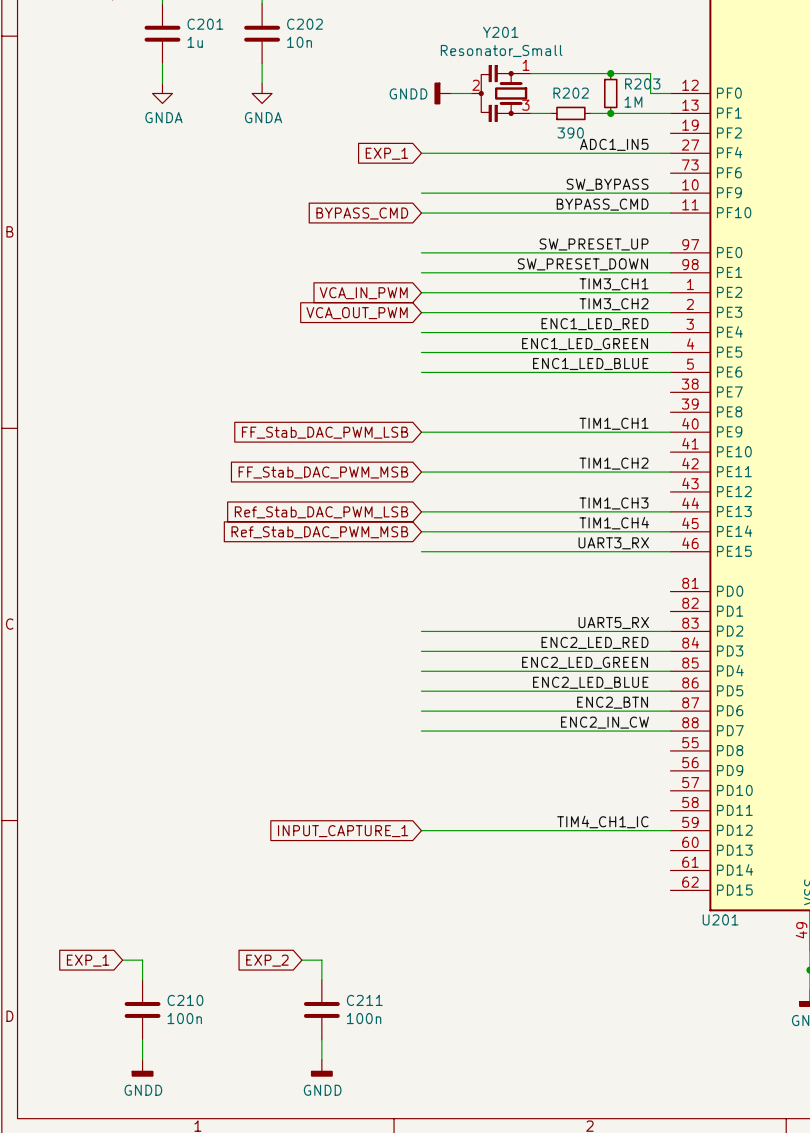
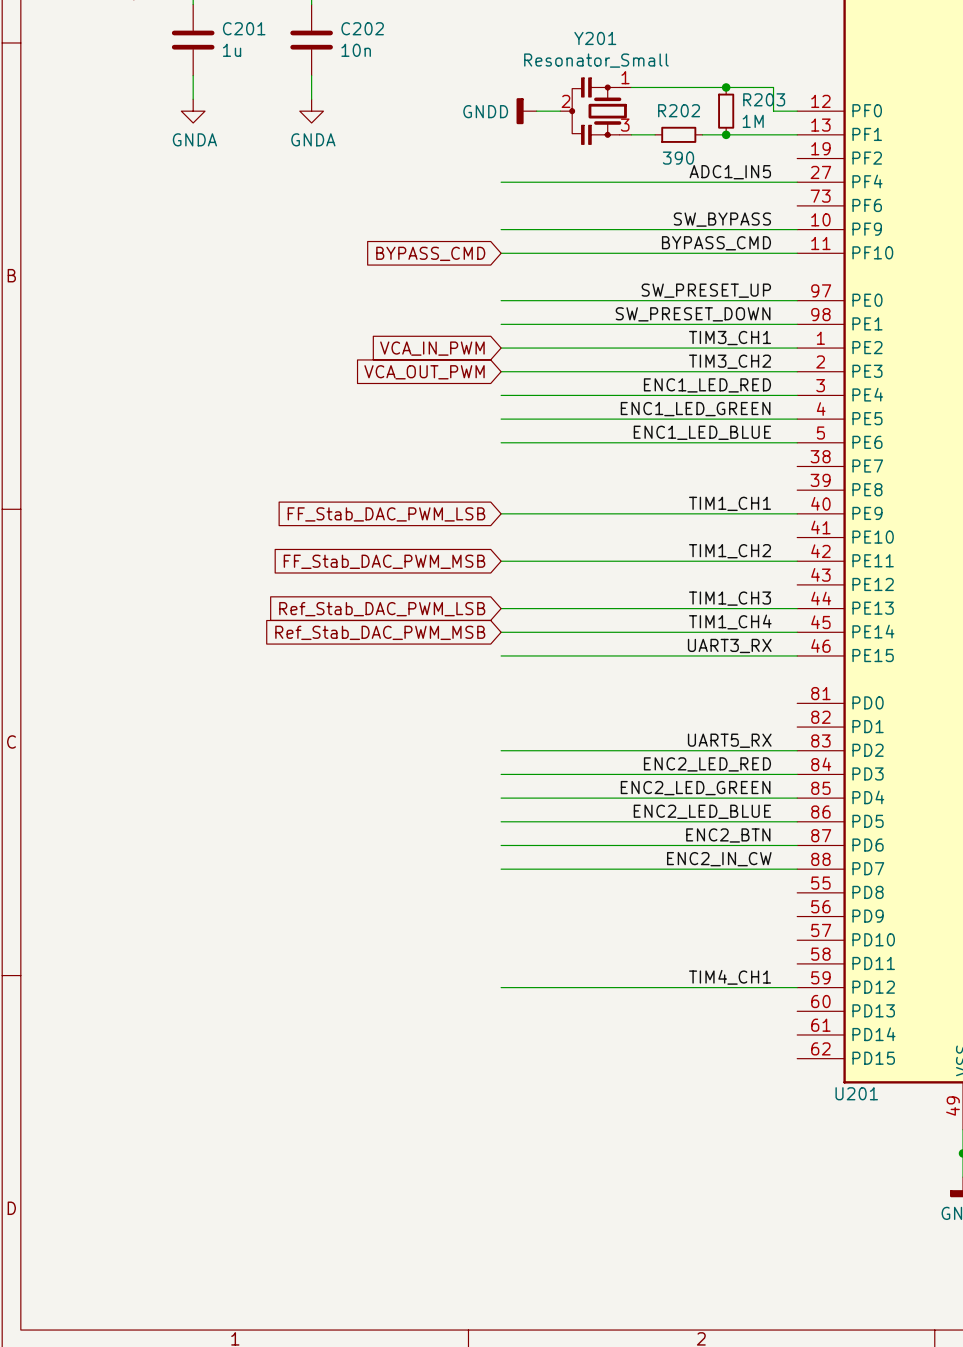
global label: EXP_1 (386, 153) -> none
label: TIM4_CH1_IC (602, 822) -> TIM4_CH1 (730, 977)
global label: INPUT_CAPTURE_1 (343, 831) -> none
global label: EXP_1 (88, 960) -> none
wire: (122, 960) (142, 960) (142, 980) -> none
global label: EXP_2 (267, 960) -> none
wire: (301, 960) (321, 960) (321, 980) -> none
C210: 100n (142, 1009) -> none
C211: 100n (321, 1009) -> none
wire: (142, 1039) (142, 1059) -> none
wire: (321, 1039) (321, 1059) -> none
power symbol: GNDD (142, 1068) -> none
power symbol: GNDD (321, 1068) -> none

